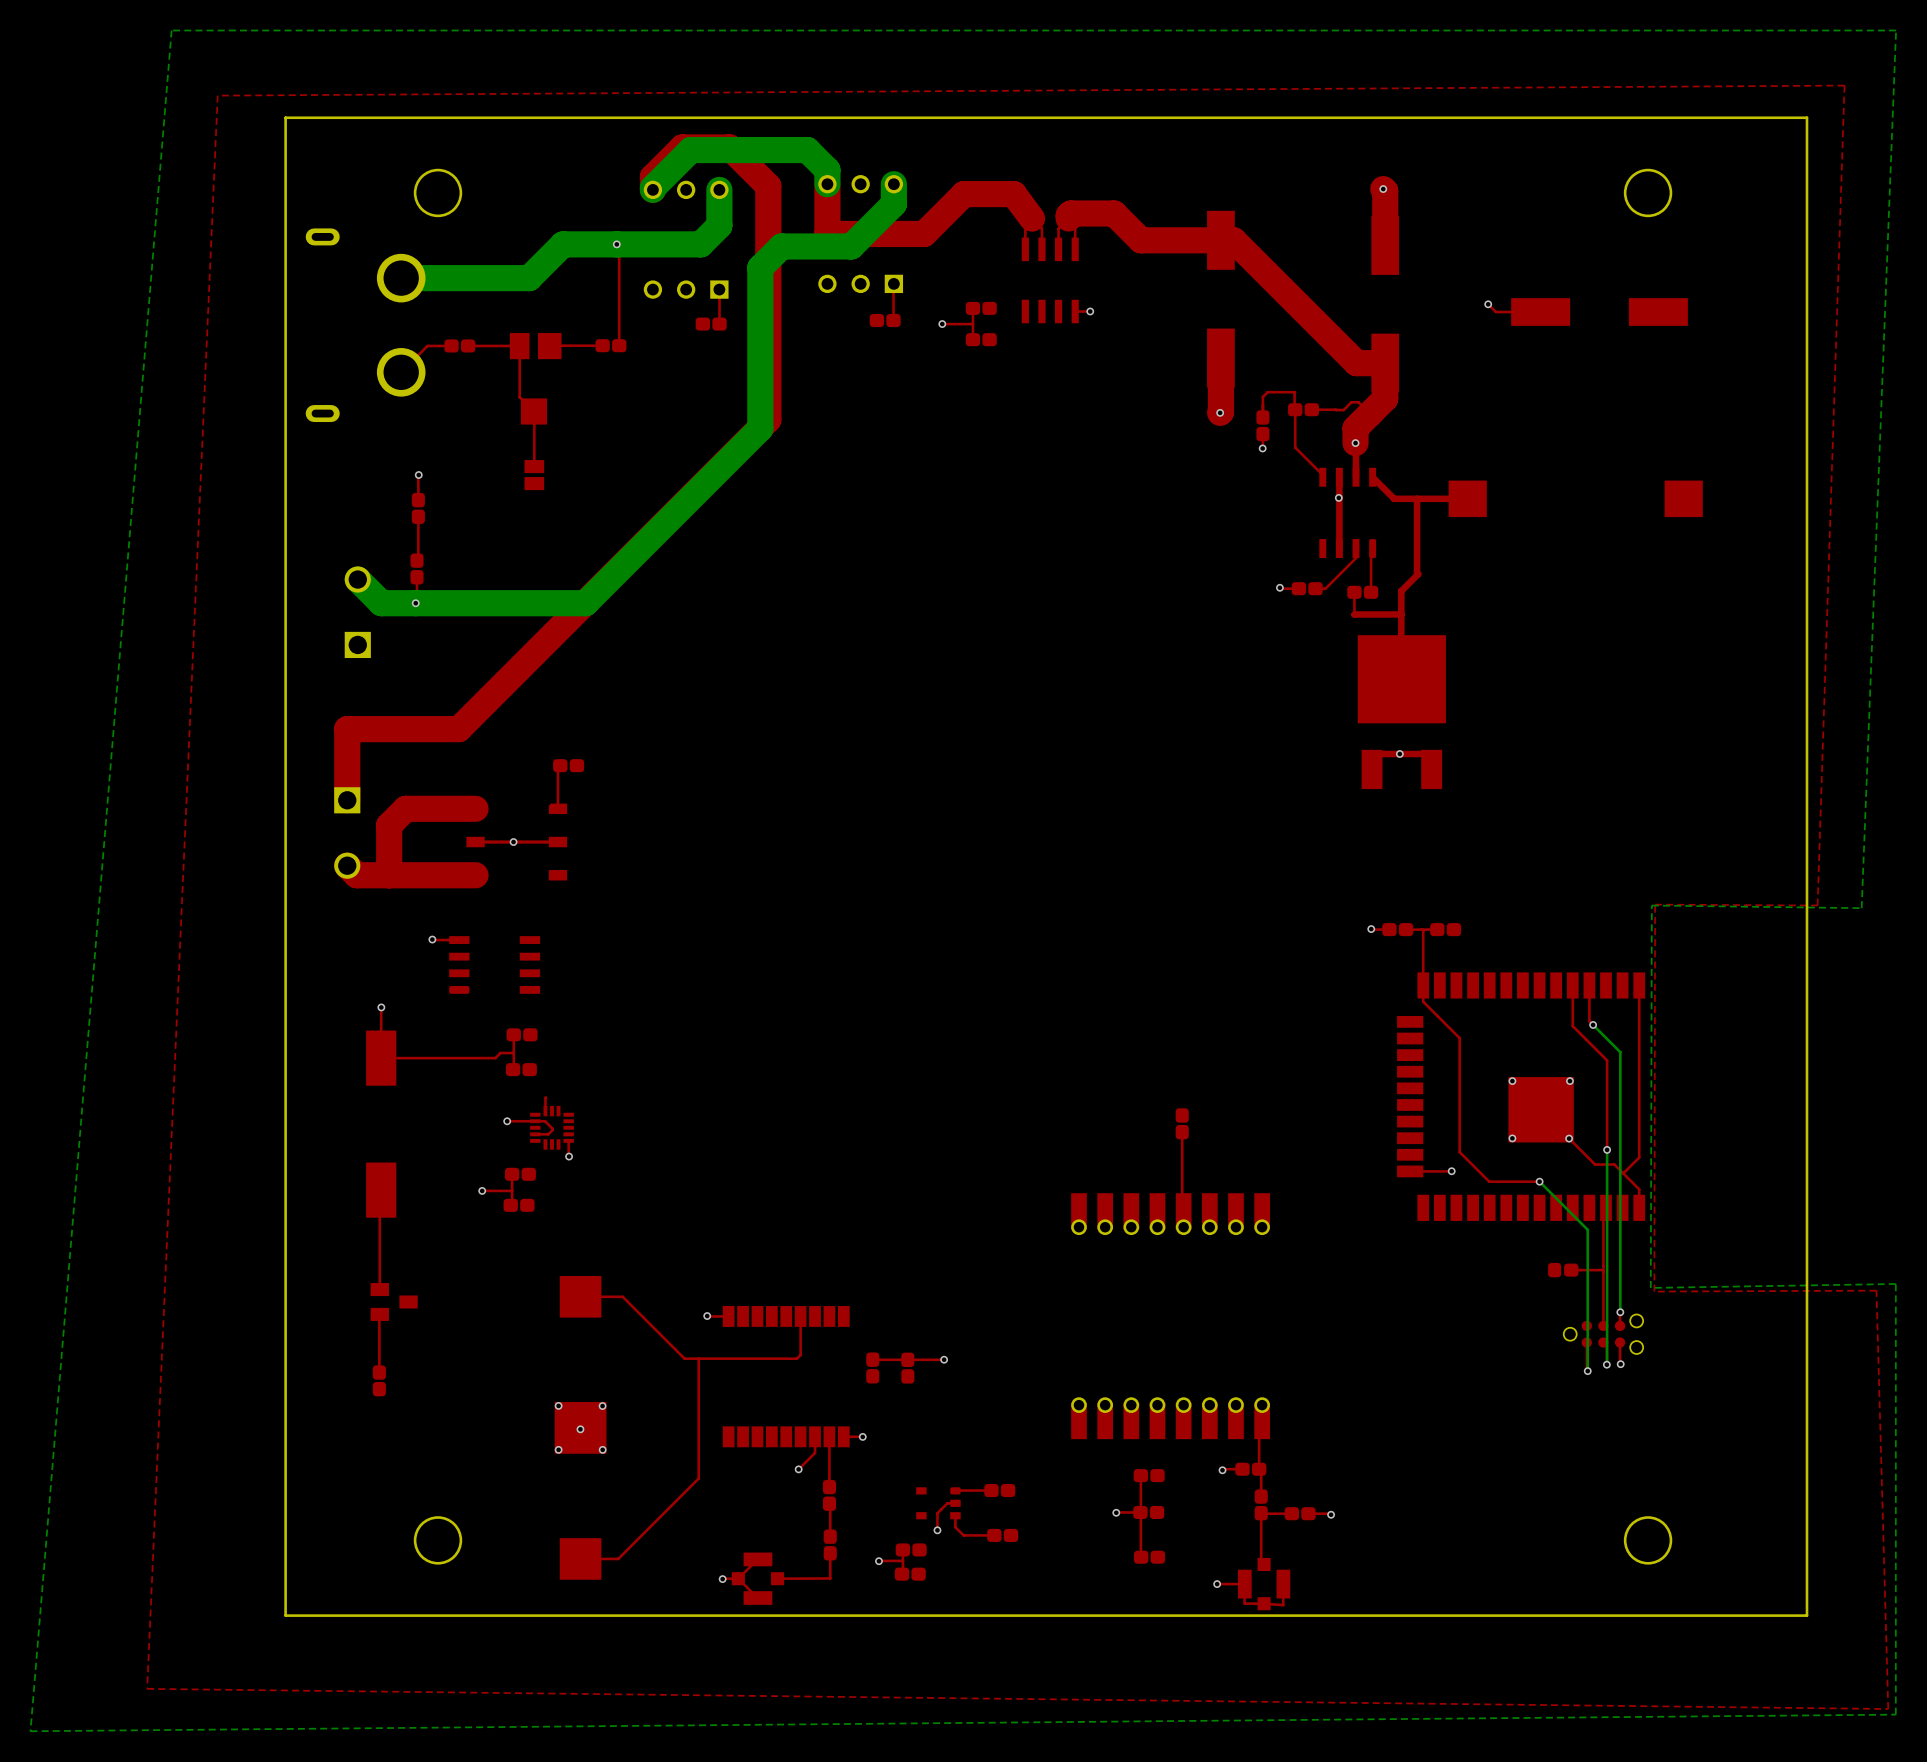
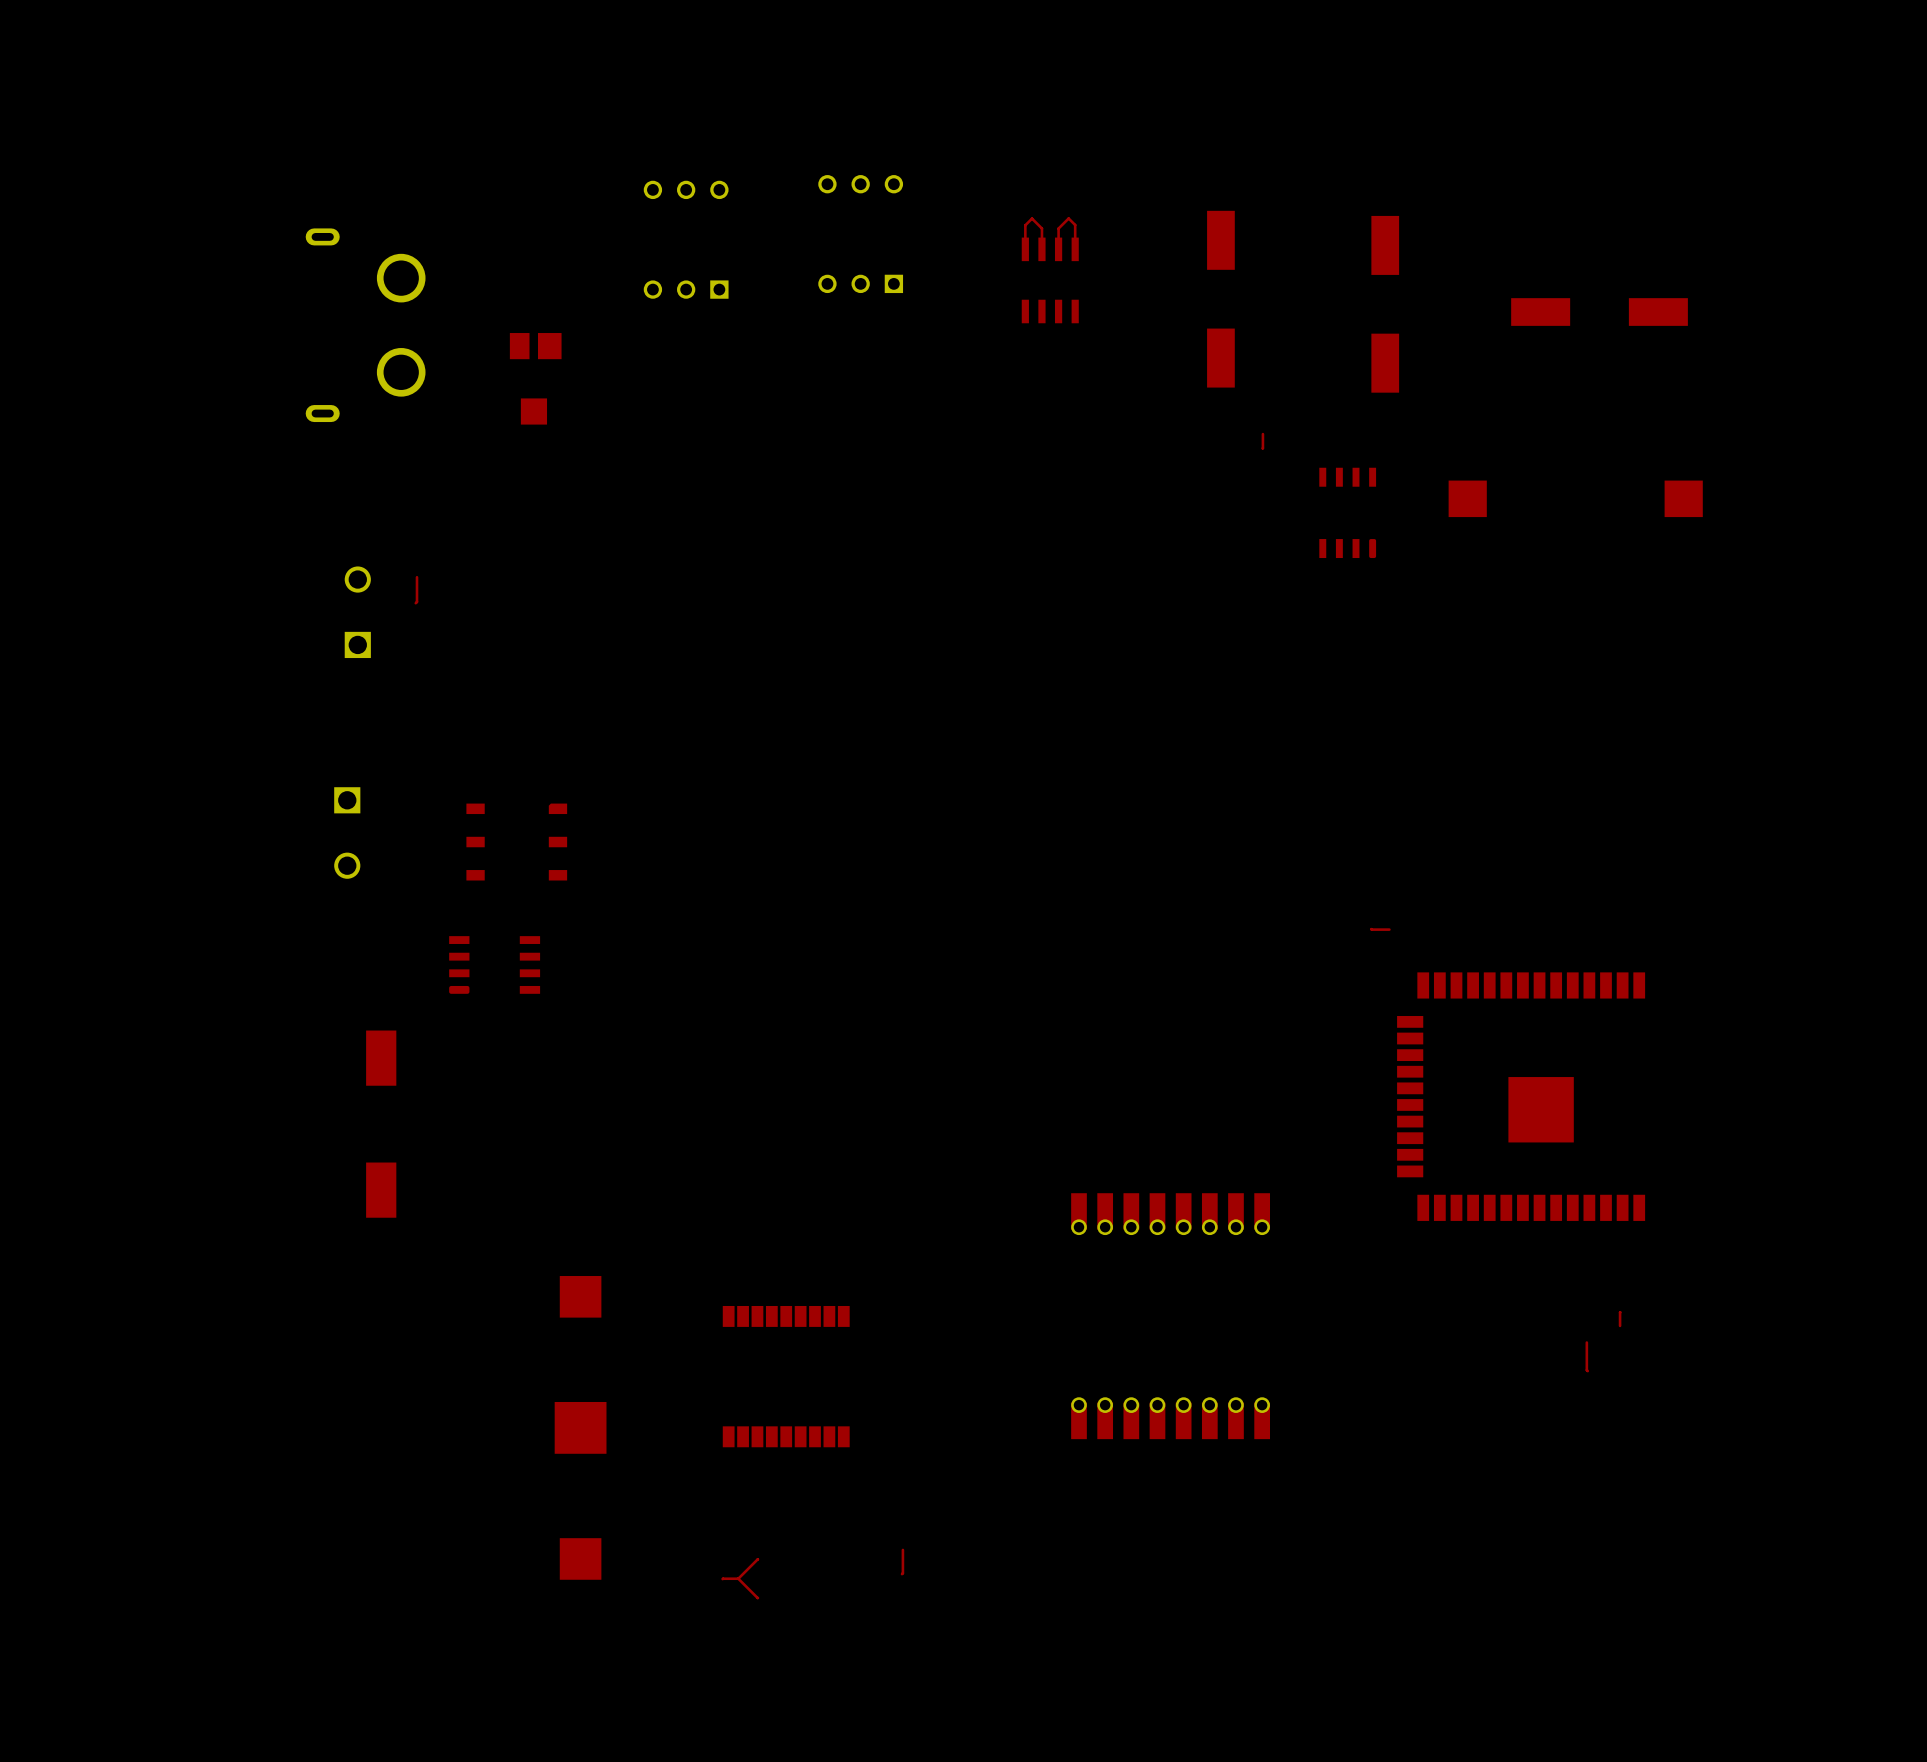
bottom zone outline: (1896, 30) (1861, 908) (1651, 905) (1650, 1287) (1895, 1283) (1895, 1714) (30, 1731) (171, 30) (1896, 30) -> none
top zone outline: (1844, 85) (1817, 905) (1655, 904) (1654, 1291) (1876, 1290) (1888, 1709) (147, 1688) (217, 95) (1844, 85) -> none
board edge: (1807, 117) (285, 117) (285, 1615) (1807, 1615) (1807, 117) -> none
round board edge: [413, 168, 463, 218] -> none
round board edge: [1623, 168, 1673, 218] -> none
top track: (827, 184) (827, 233) (924, 233) (964, 194) (1013, 194) (1032, 218) -> none
bottom track: (827, 184) (827, 170) (807, 150) (690, 150) (652, 189) -> none
bottom track: (893, 184) (893, 203) (851, 246) (781, 246) (760, 267) (760, 428) (585, 603) (381, 603) (357, 579) -> none
top track: (652, 189) (652, 176) (682, 147) (729, 147) (768, 186) (768, 419) (458, 729) (347, 729) (347, 800) -> none
bottom track: (719, 189) (719, 225) (700, 244) (563, 244) (529, 278) (401, 278) -> none
top track: (1383, 189) (1385, 191) (1385, 245) -> none
via: (1383, 189) -> none
top track: (1068, 218) (1070, 213) (1114, 213) (1141, 240) (1233, 240) (1356, 363) (1385, 363) (1385, 398) (1355, 428) (1356, 477) -> none
top track: (616, 244) (619, 246) (619, 345) -> none
via: (616, 244) -> none
top track: (893, 283) (893, 320) -> none
top track: (719, 289) (719, 324) -> none
top track: (1488, 304) (1495, 312) (1540, 312) -> none
via: (1488, 304) -> none
top track: (972, 308) (972, 339) -> none
part: (981, 308) -> none
top track: (1090, 311) (1075, 311) -> none
via: (1090, 311) -> none
part: (885, 320) -> none
part: (711, 324) -> none
via: (942, 324) -> none
top track: (972, 324) (942, 324) -> none
part: (981, 339) -> none
top track: (451, 345) (427, 345) (401, 372) -> none
part: (459, 345) -> none
top track: (519, 345) (468, 345) -> none
top track: (602, 345) (549, 346) -> none
part: (610, 345) -> none
top track: (519, 346) (519, 397) (534, 411) (534, 466) -> none
top track: (1220, 358) (1220, 412) -> none
top track: (1295, 409) (1295, 447) (1322, 477) -> none
part: (1303, 409) -> none
top track: (1311, 409) (1343, 410) (1351, 402) (1358, 402) (1370, 413) -> none
top track: (1295, 411) (1294, 392) (1267, 392) (1262, 396) (1262, 417) -> none
via: (1220, 412) -> none
part: (1262, 425) -> none
via: (1355, 443) -> none
via: (1262, 448) -> none
top track: (418, 475) (418, 500) -> none
via: (418, 475) -> none
part: (534, 475) -> none
top track: (1339, 477) (1339, 548) -> none
top track: (1372, 477) (1394, 498) (1415, 498) -> none
via: (1338, 497) -> none
top track: (1467, 498) (1417, 498) (1418, 574) (1401, 591) (1401, 663) -> none
part: (418, 508) -> none
top track: (418, 516) (416, 560) -> none
top track: (1356, 548) (1356, 558) (1325, 588) (1315, 588) -> none
top track: (1372, 548) (1371, 550) (1371, 592) -> none
part: (416, 568) -> none
top track: (1279, 587) (1298, 588) -> none
via: (1279, 587) -> none
part: (1307, 588) -> none
top track: (1354, 592) (1354, 614) (1401, 614) -> none
part: (1362, 592) -> none
via: (415, 603) -> none
part: (1401, 712) -> none
via: (1399, 753) -> none
top track: (1431, 753) (1371, 753) -> none
top track: (560, 765) (557, 767) (557, 808) -> none
part: (568, 765) -> none
top track: (475, 808) (405, 808) (389, 825) (389, 875) -> none
via: (513, 842) -> none
top track: (557, 842) (475, 842) -> none
top track: (347, 865) (356, 875) (475, 875) -> none
via: (1371, 929) -> none
part: (1397, 929) -> none
top track: (1422, 929) (1423, 1001) (1459, 1038) (1459, 1152) (1489, 1181) (1539, 1181) -> none
top track: (1437, 929) (1406, 929) -> none
part: (1445, 929) -> none
top track: (432, 939) (459, 940) -> none
via: (432, 939) -> none
top track: (1572, 985) (1572, 1026) (1607, 1060) (1607, 1149) -> none
top track: (1589, 985) (1589, 1021) (1593, 1024) -> none
top track: (1639, 985) (1639, 1157) (1623, 1173) -> none
top track: (381, 1007) (381, 1058) (495, 1058) (500, 1053) (513, 1053) -> none
via: (381, 1007) -> none
bottom track: (1593, 1024) (1620, 1052) (1620, 1312) -> none
via: (1593, 1024) -> none
top track: (513, 1034) (513, 1069) -> none
part: (522, 1034) -> none
part: (521, 1069) -> none
via: (1512, 1081) -> none
via: (1569, 1081) -> none
top track: (546, 1097) (545, 1111) -> none
top track: (1541, 1109) (1595, 1164) (1614, 1164) (1639, 1189) (1639, 1207) -> none
top track: (506, 1121) (545, 1121) (552, 1128) (548, 1134) (535, 1134) -> none
via: (507, 1121) -> none
part: (1182, 1123) -> none
part: (551, 1127) -> none
top track: (1182, 1132) (1183, 1211) -> none
via: (1512, 1138) -> none
via: (1569, 1138) -> none
top track: (568, 1140) (569, 1156) -> none
bottom track: (1607, 1149) (1606, 1364) -> none
via: (1607, 1149) -> none
via: (569, 1156) -> none
top track: (1451, 1171) (1410, 1171) -> none
via: (1451, 1171) -> none
top track: (512, 1174) (510, 1205) -> none
part: (520, 1174) -> none
bottom track: (1539, 1181) (1587, 1229) (1587, 1371) -> none
via: (1539, 1181) -> none
top track: (381, 1190) (379, 1289) -> none
via: (482, 1190) -> none
top track: (512, 1190) (482, 1190) -> none
part: (519, 1205) -> none
top track: (1605, 1207) (1603, 1210) (1603, 1325) -> none
part: (1563, 1270) -> none
top track: (1602, 1270) (1571, 1270) -> none
top track: (580, 1296) (622, 1296) (684, 1358) (796, 1358) (800, 1355) (800, 1316) -> none
part: (394, 1301) -> none
via: (1620, 1312) -> none
top track: (379, 1314) (379, 1372) -> none
top track: (707, 1316) (728, 1316) -> none
via: (707, 1316) -> none
part: (1603, 1334) -> none
top track: (1620, 1342) (1620, 1364) -> none
top track: (698, 1358) (698, 1478) (618, 1558) (580, 1558) -> none
top track: (944, 1359) (872, 1359) -> none
via: (944, 1359) -> none
via: (1606, 1364) -> none
via: (1620, 1364) -> none
part: (872, 1367) -> none
part: (907, 1368) -> none
via: (1587, 1371) -> none
part: (379, 1380) -> none
via: (558, 1405) -> none
via: (602, 1406) -> none
top track: (1262, 1420) (1259, 1423) (1259, 1469) (1261, 1471) (1262, 1495) -> none
via: (580, 1429) -> none
top track: (815, 1436) (815, 1453) (798, 1469) -> none
top track: (829, 1436) (829, 1487) -> none
top track: (862, 1436) (843, 1436) -> none
via: (862, 1436) -> none
via: (558, 1449) -> none
via: (602, 1449) -> none
via: (798, 1469) -> none
top track: (1242, 1469) (1222, 1470) -> none
part: (1250, 1469) -> none
via: (1222, 1470) -> none
top track: (1140, 1475) (1141, 1557) -> none
part: (1149, 1475) -> none
top track: (991, 1490) (955, 1490) -> none
part: (999, 1490) -> none
part: (829, 1495) -> none
top track: (829, 1503) (830, 1536) -> none
part: (938, 1503) -> none
top track: (955, 1503) (947, 1503) (937, 1513) (937, 1530) -> none
part: (1261, 1504) -> none
via: (1116, 1512) -> none
top track: (1140, 1512) (1116, 1512) -> none
part: (1148, 1512) -> none
top track: (1291, 1513) (1261, 1513) (1261, 1561) (1264, 1564) -> none
part: (1300, 1513) -> none
top track: (1308, 1513) (1331, 1514) -> none
via: (1331, 1514) -> none
top track: (955, 1515) (955, 1527) (963, 1535) (994, 1535) -> none
round board edge: [413, 1516, 463, 1565] -> none
round board edge: [1623, 1516, 1673, 1565] -> none
via: (937, 1530) -> none
part: (1002, 1535) -> none
part: (830, 1544) -> none
part: (911, 1549) -> none
top track: (830, 1553) (830, 1578) (777, 1578) -> none
part: (1149, 1557) -> none
top track: (902, 1560) (878, 1561) -> none
via: (878, 1561) -> none
part: (910, 1574) -> none
part: (757, 1578) -> none
via: (722, 1579) -> none
via: (1217, 1584) -> none
part: (1264, 1584) -> none
top track: (1283, 1584) (1283, 1605) (1244, 1603) (1244, 1584) (1217, 1584) -> none

